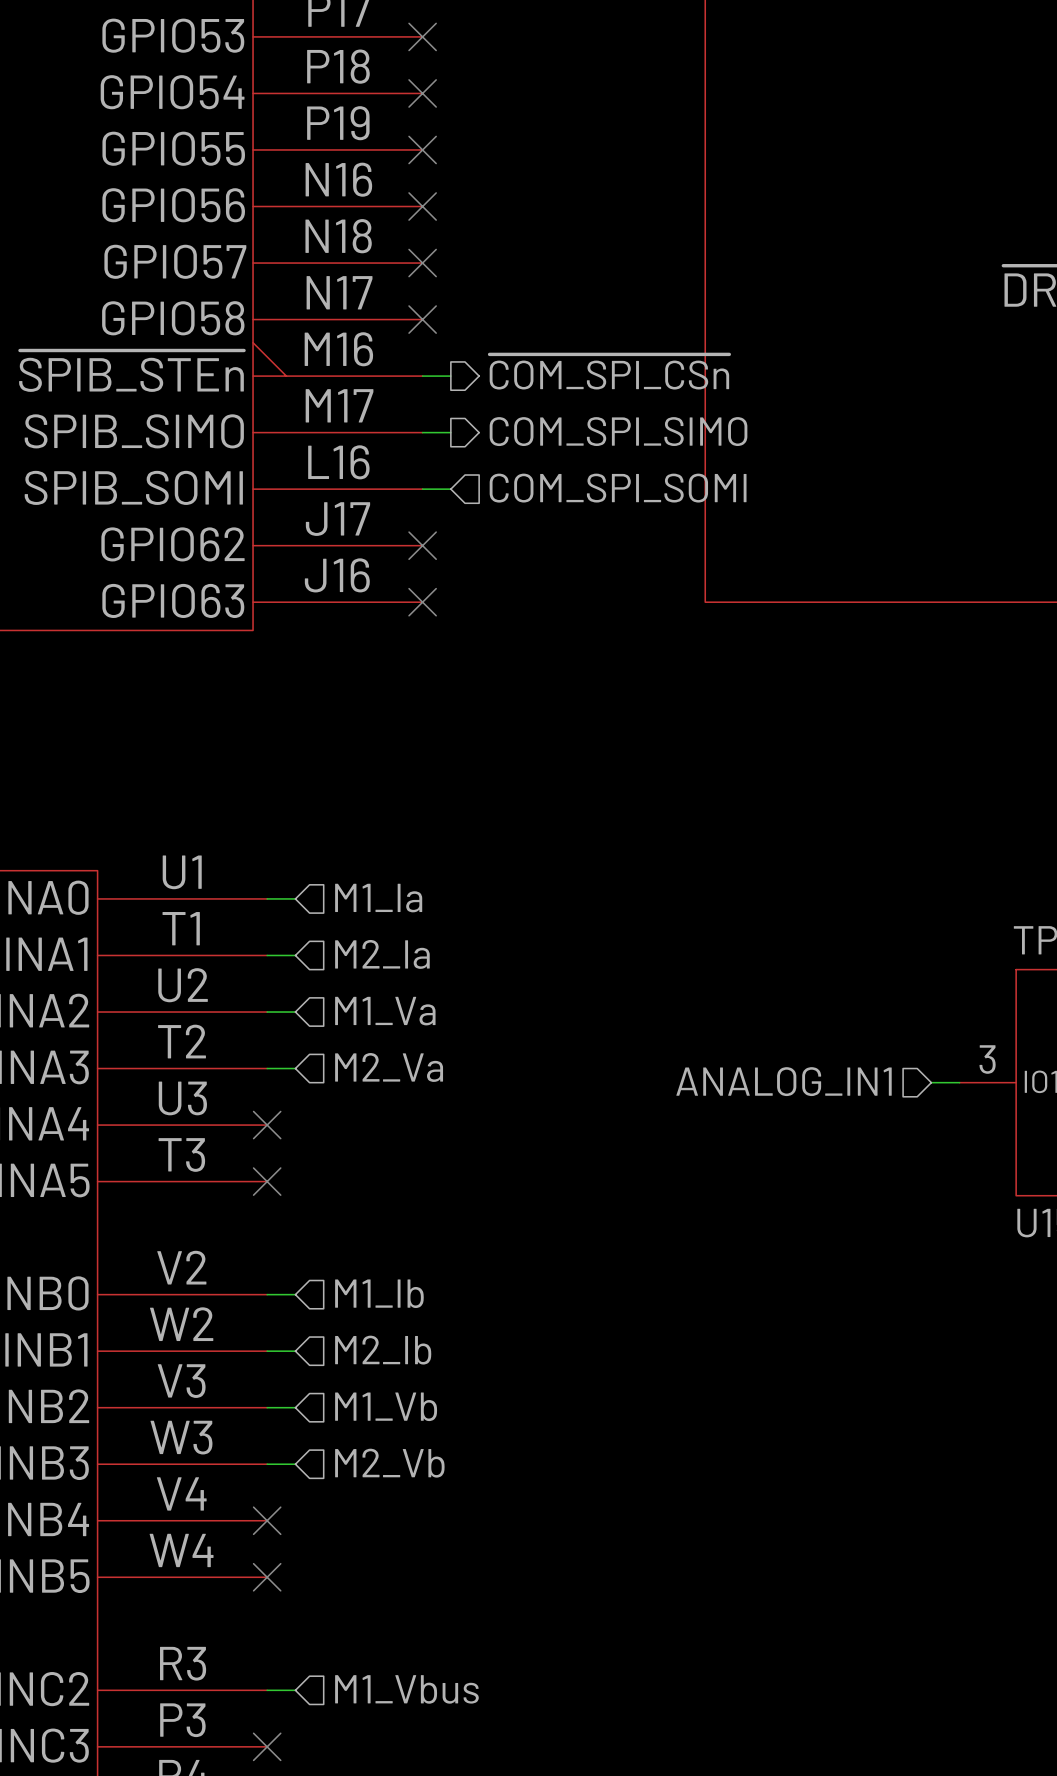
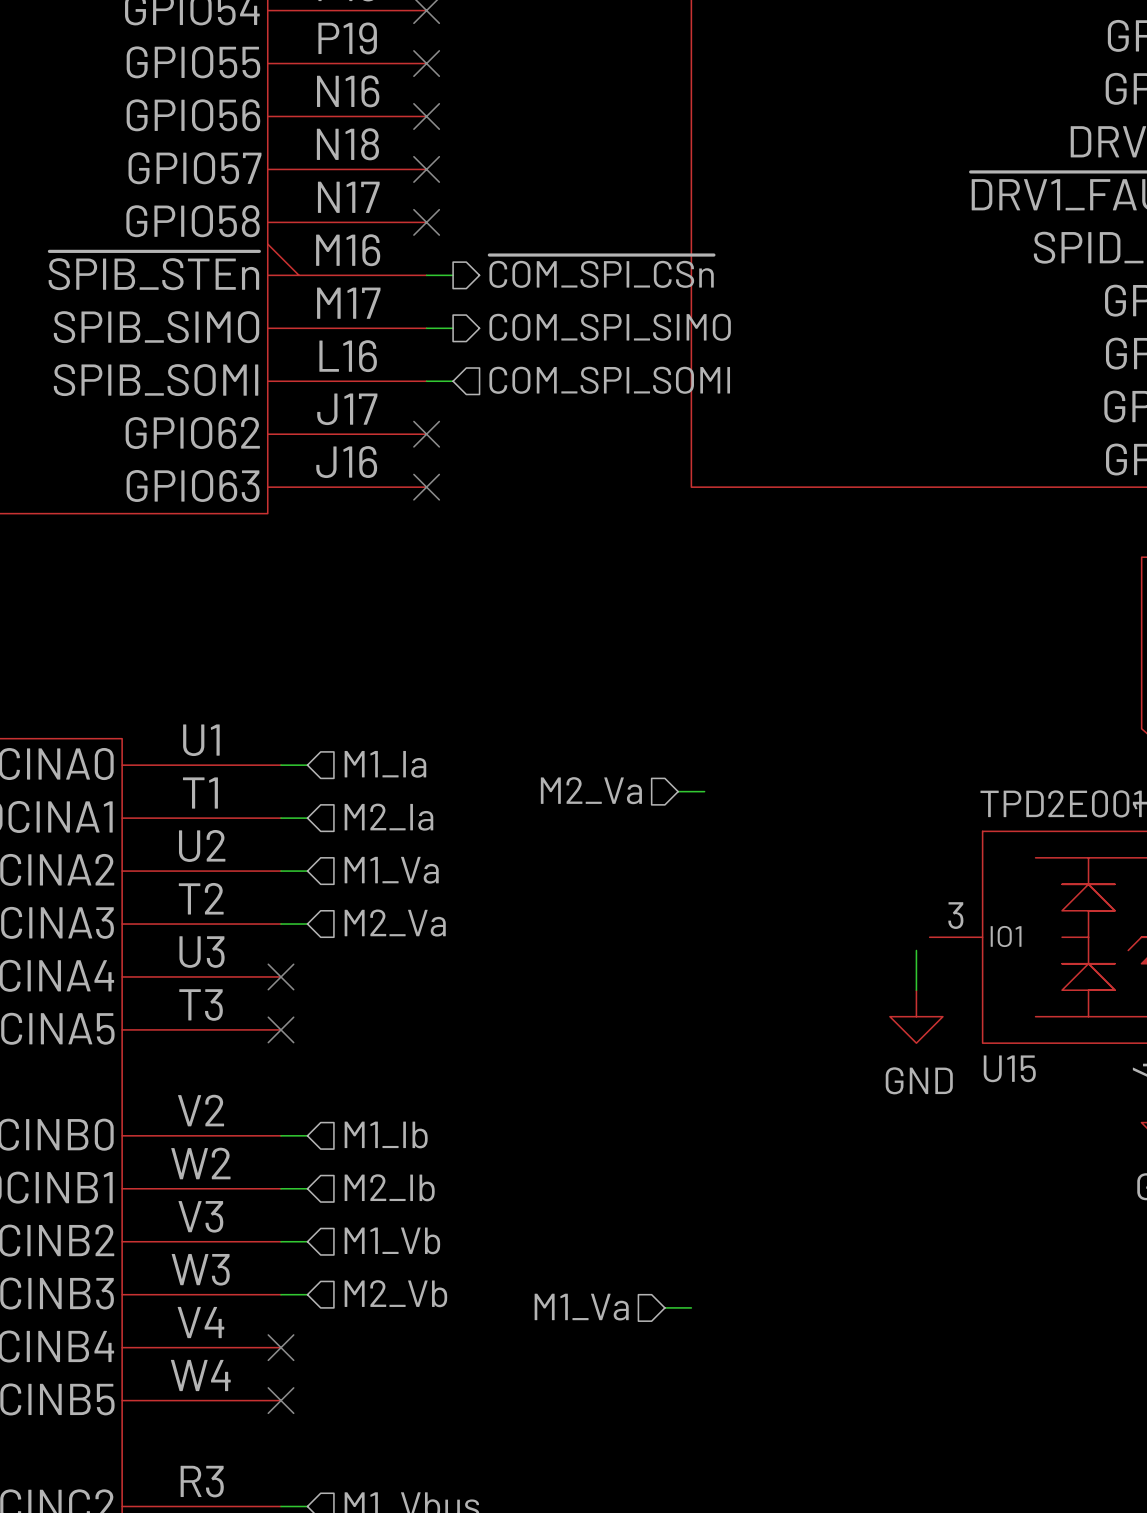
hierarchical label: none -> M2_Va (591, 790)
hierarchical label: ANALOG_IN1 (783, 1081) -> none
wire: (931, 1082) (959, 1082) -> (678, 791) (704, 791)
wire: none -> (916, 950) (916, 990)
power symbol: none -> GND (916, 1016)
hierarchical label: none -> M1_Va (581, 1307)
wire: none -> (664, 1307) (691, 1307)

